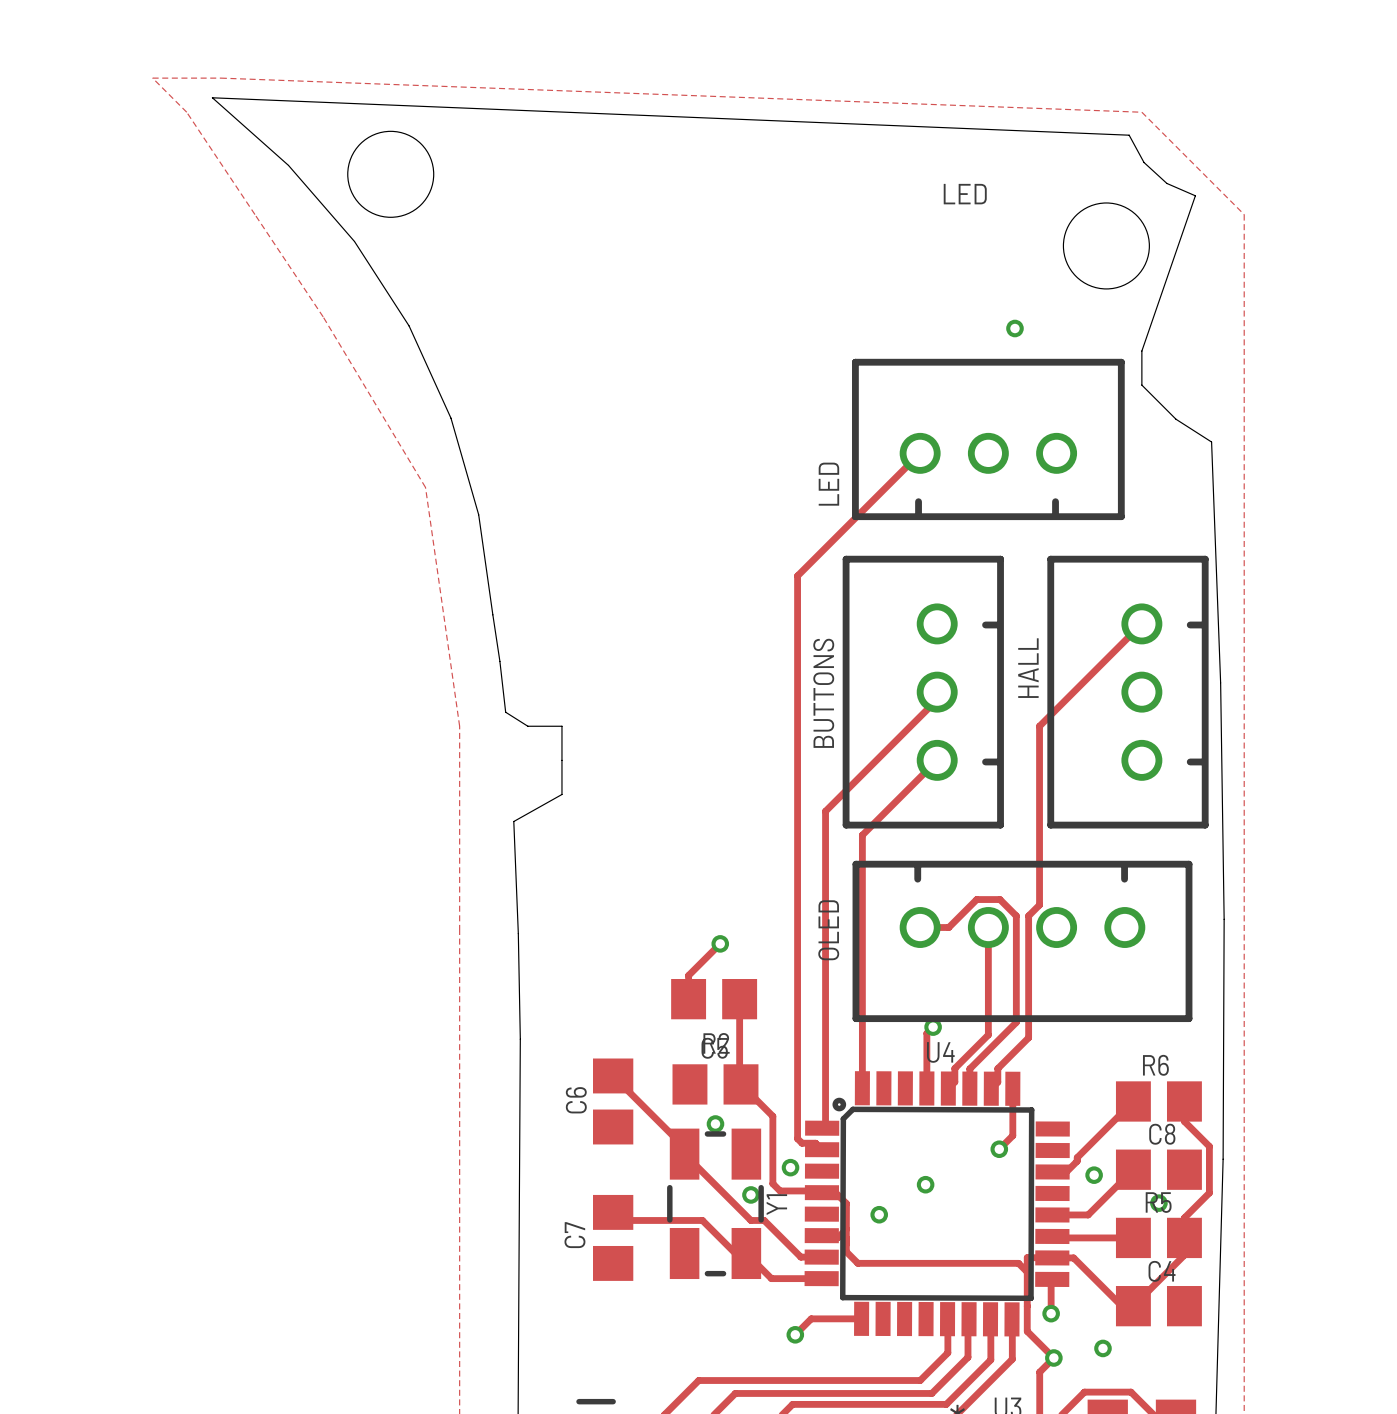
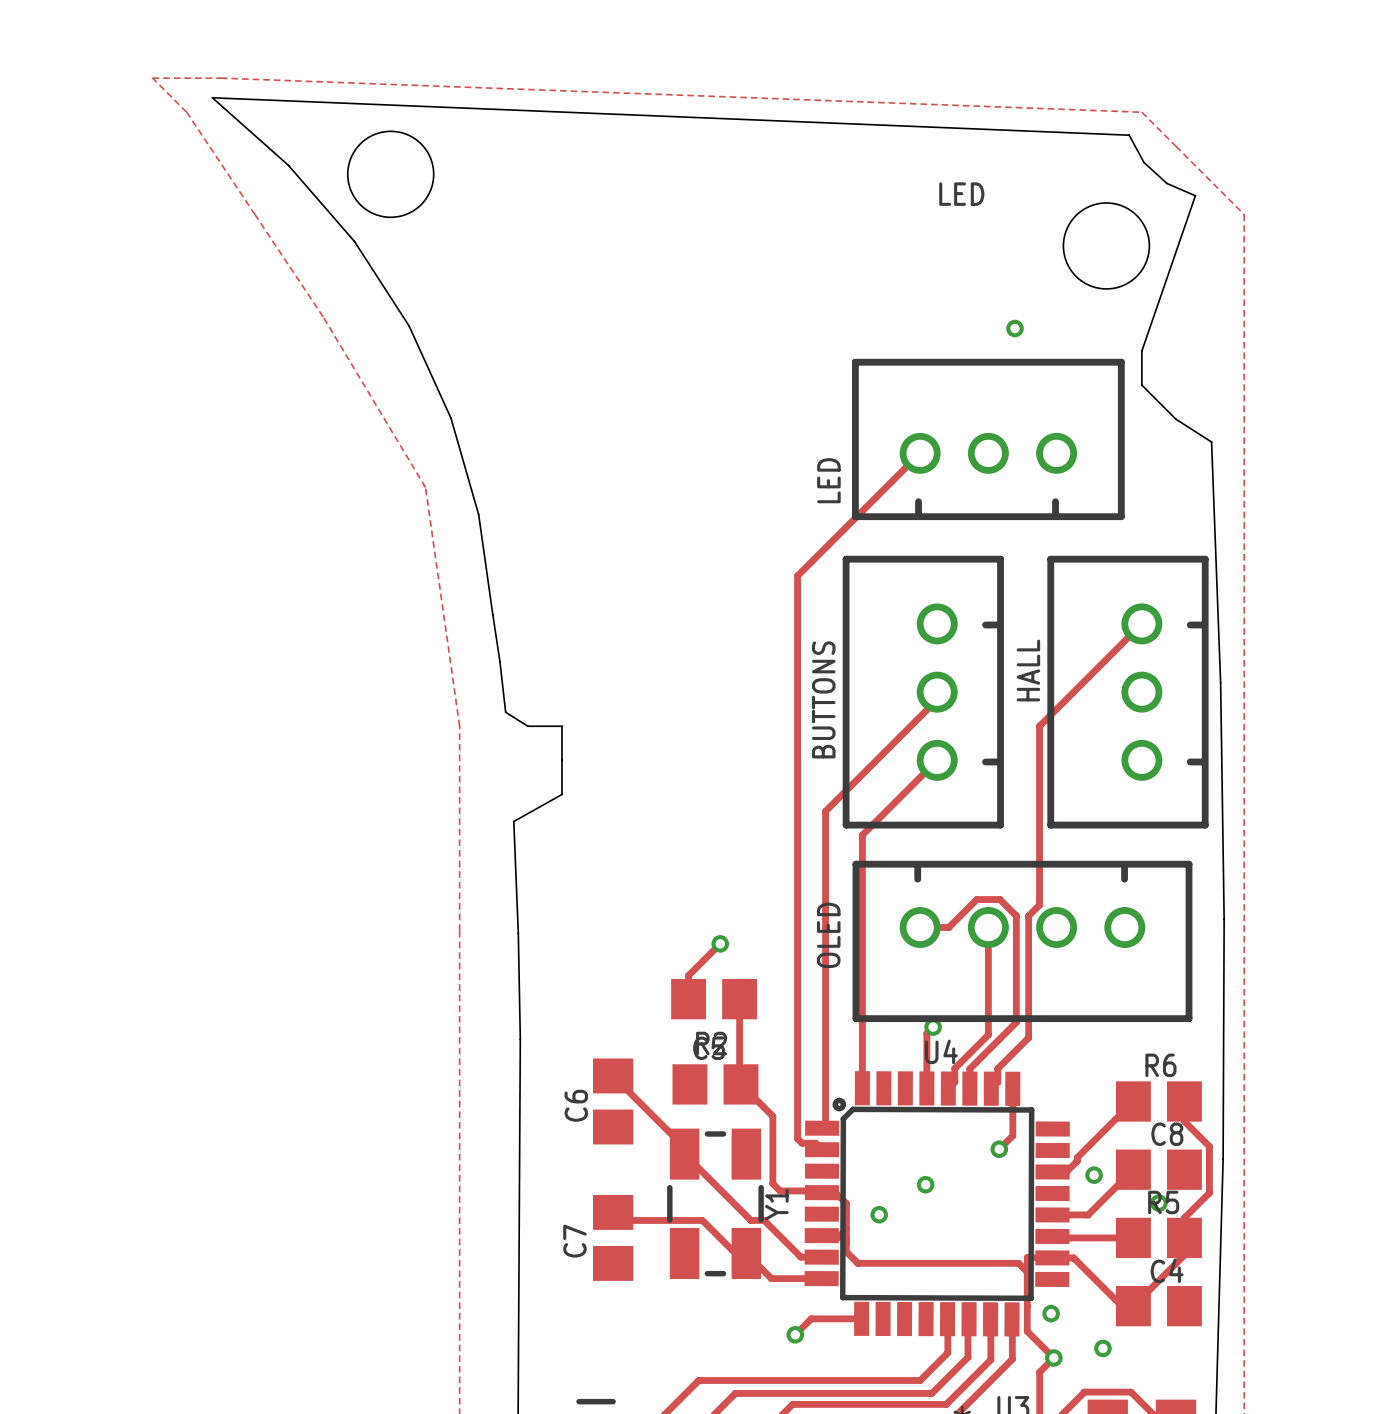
via: (715, 1123) -> none
via: (790, 1167) -> none
via: (750, 1194) -> none
track: (1052, 1279) (1051, 1313) -> none

